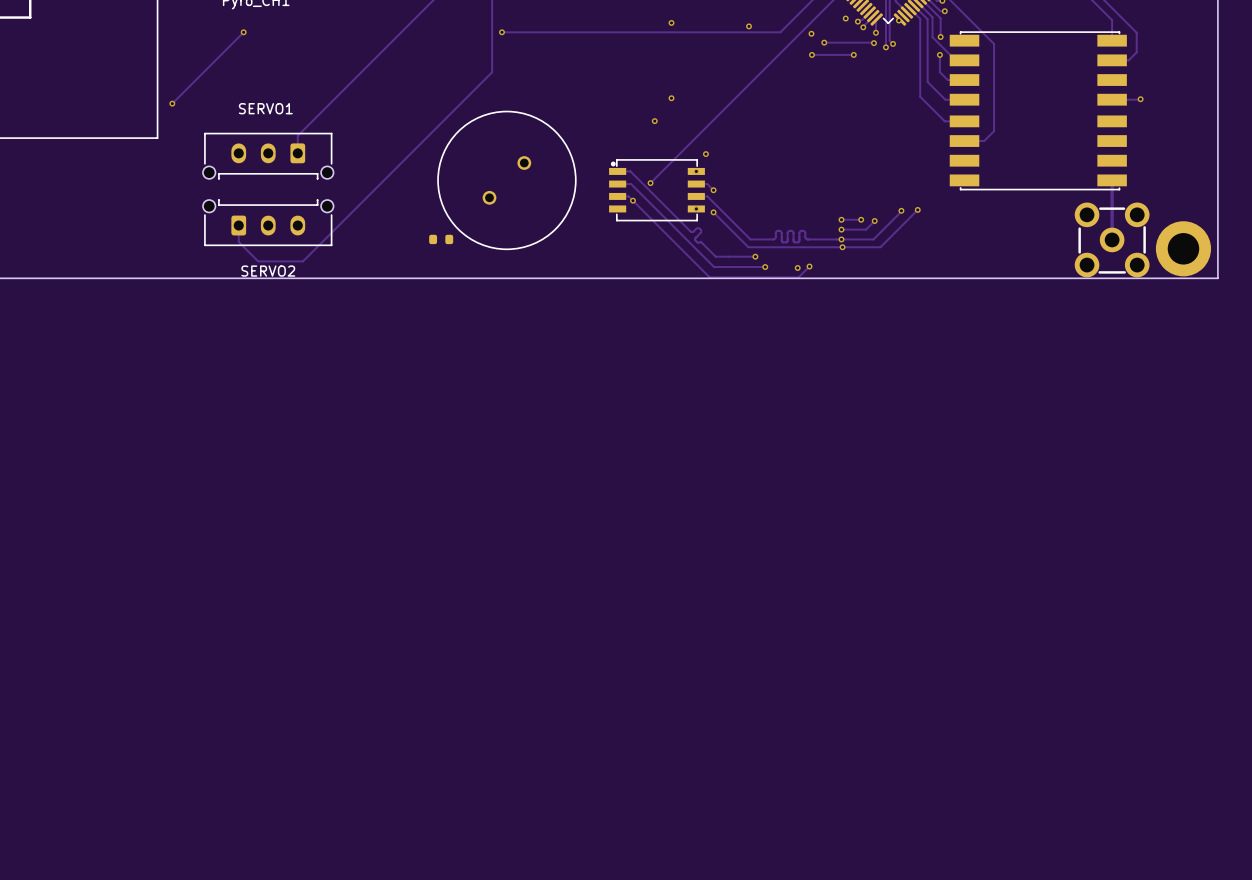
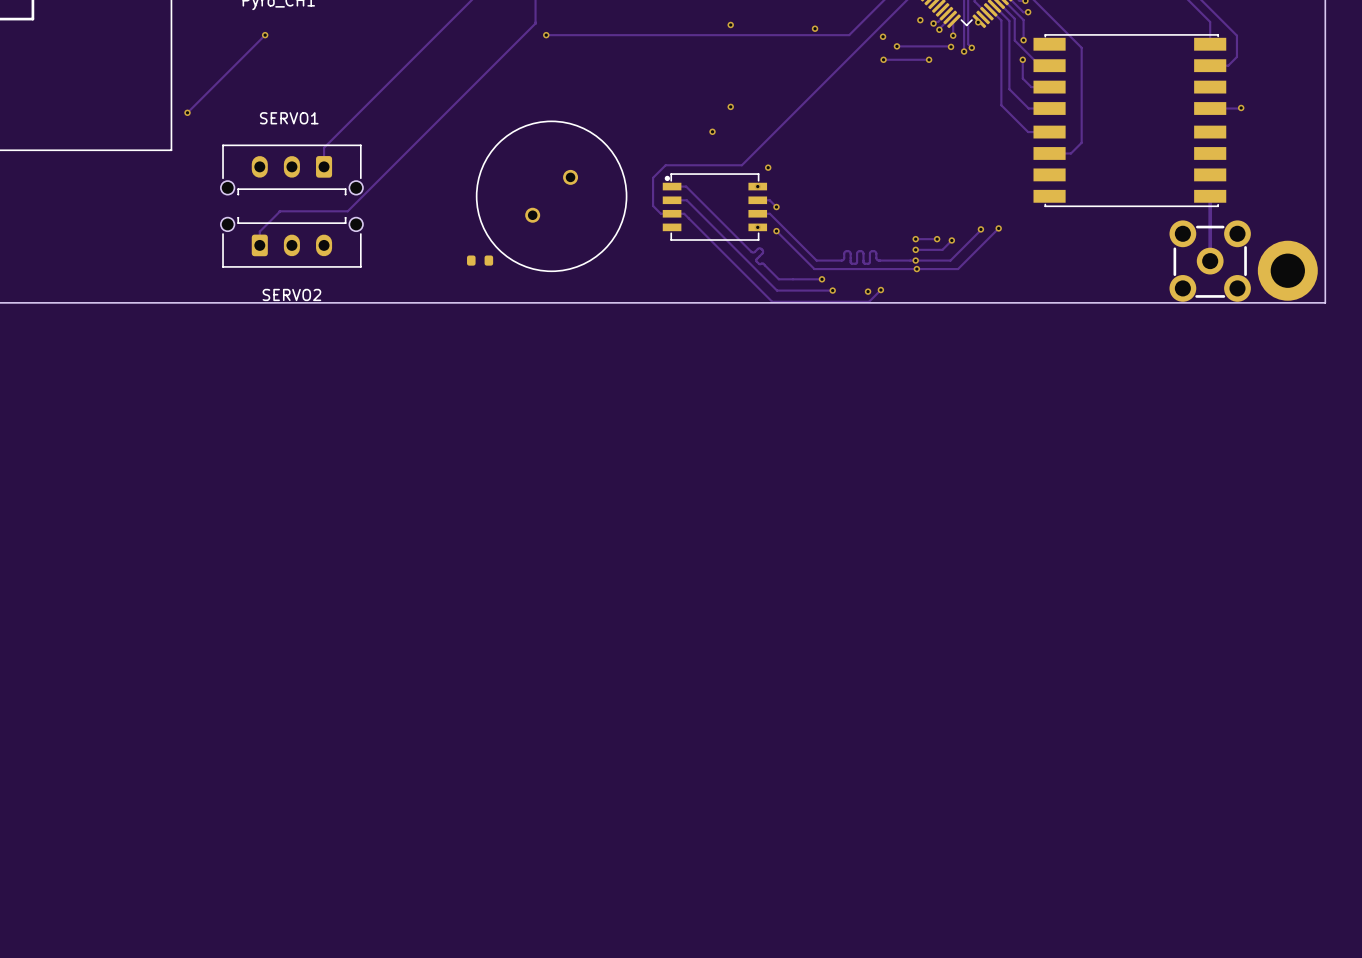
track: (492, 21) (492, 72) (303, 261) (258, 261) (238, 241) (238, 225) -> (535, 23) (347, 211) (279, 211) (259, 231) (259, 245)
track: (681, 151) (650, 183) -> (741, 165) (665, 165) (653, 177) (653, 205) (660, 213) (672, 213)
via: (650, 183) -> none
via: (632, 200) -> none

